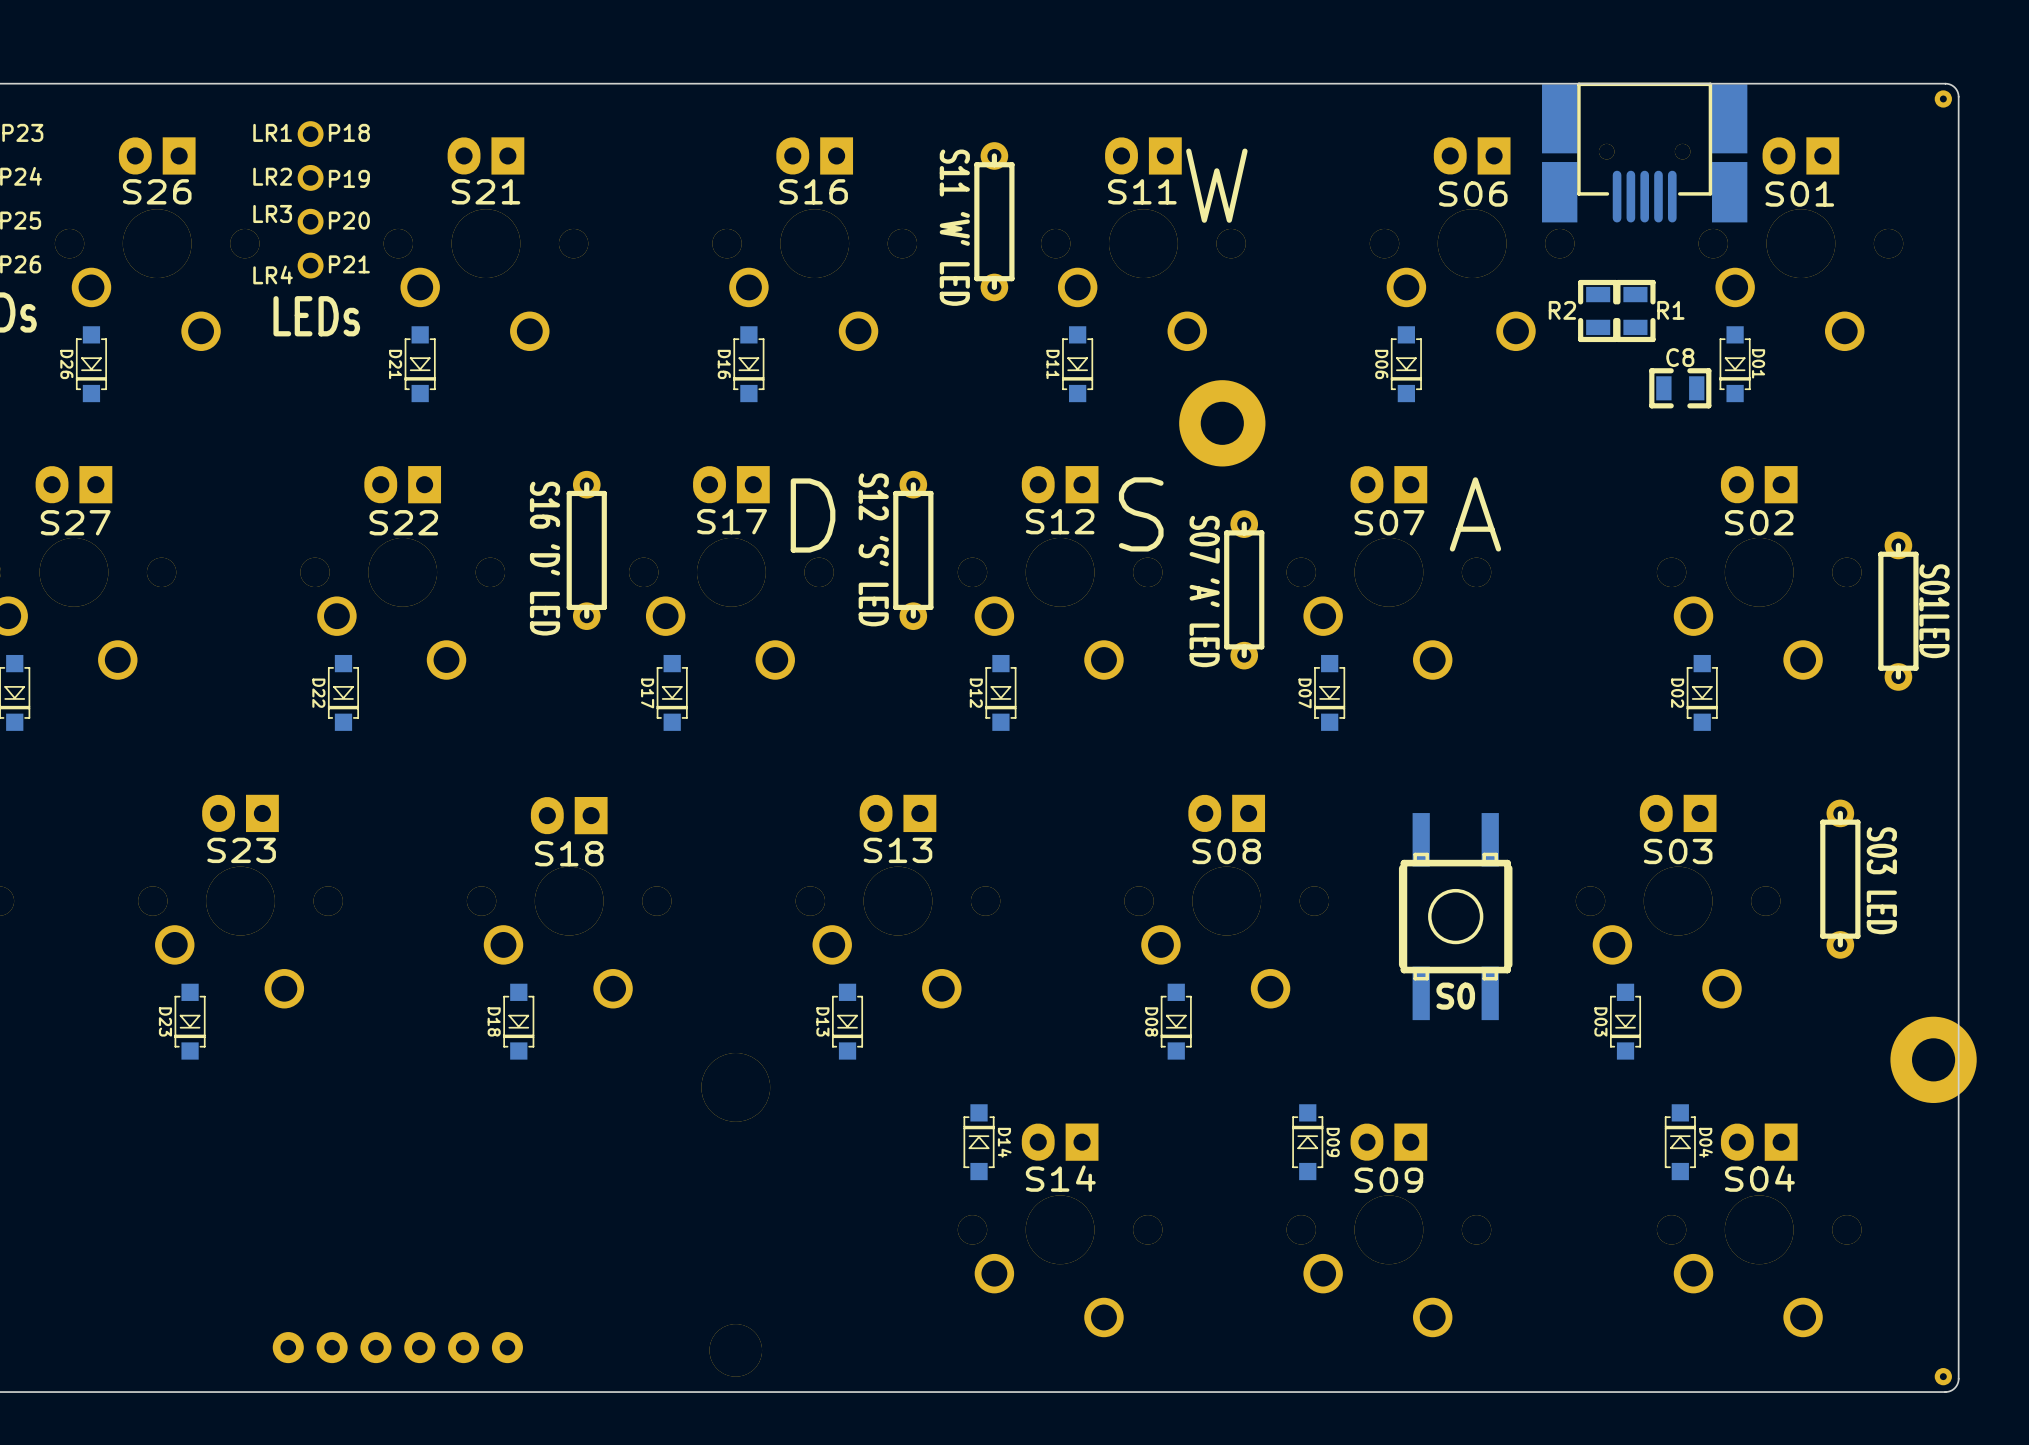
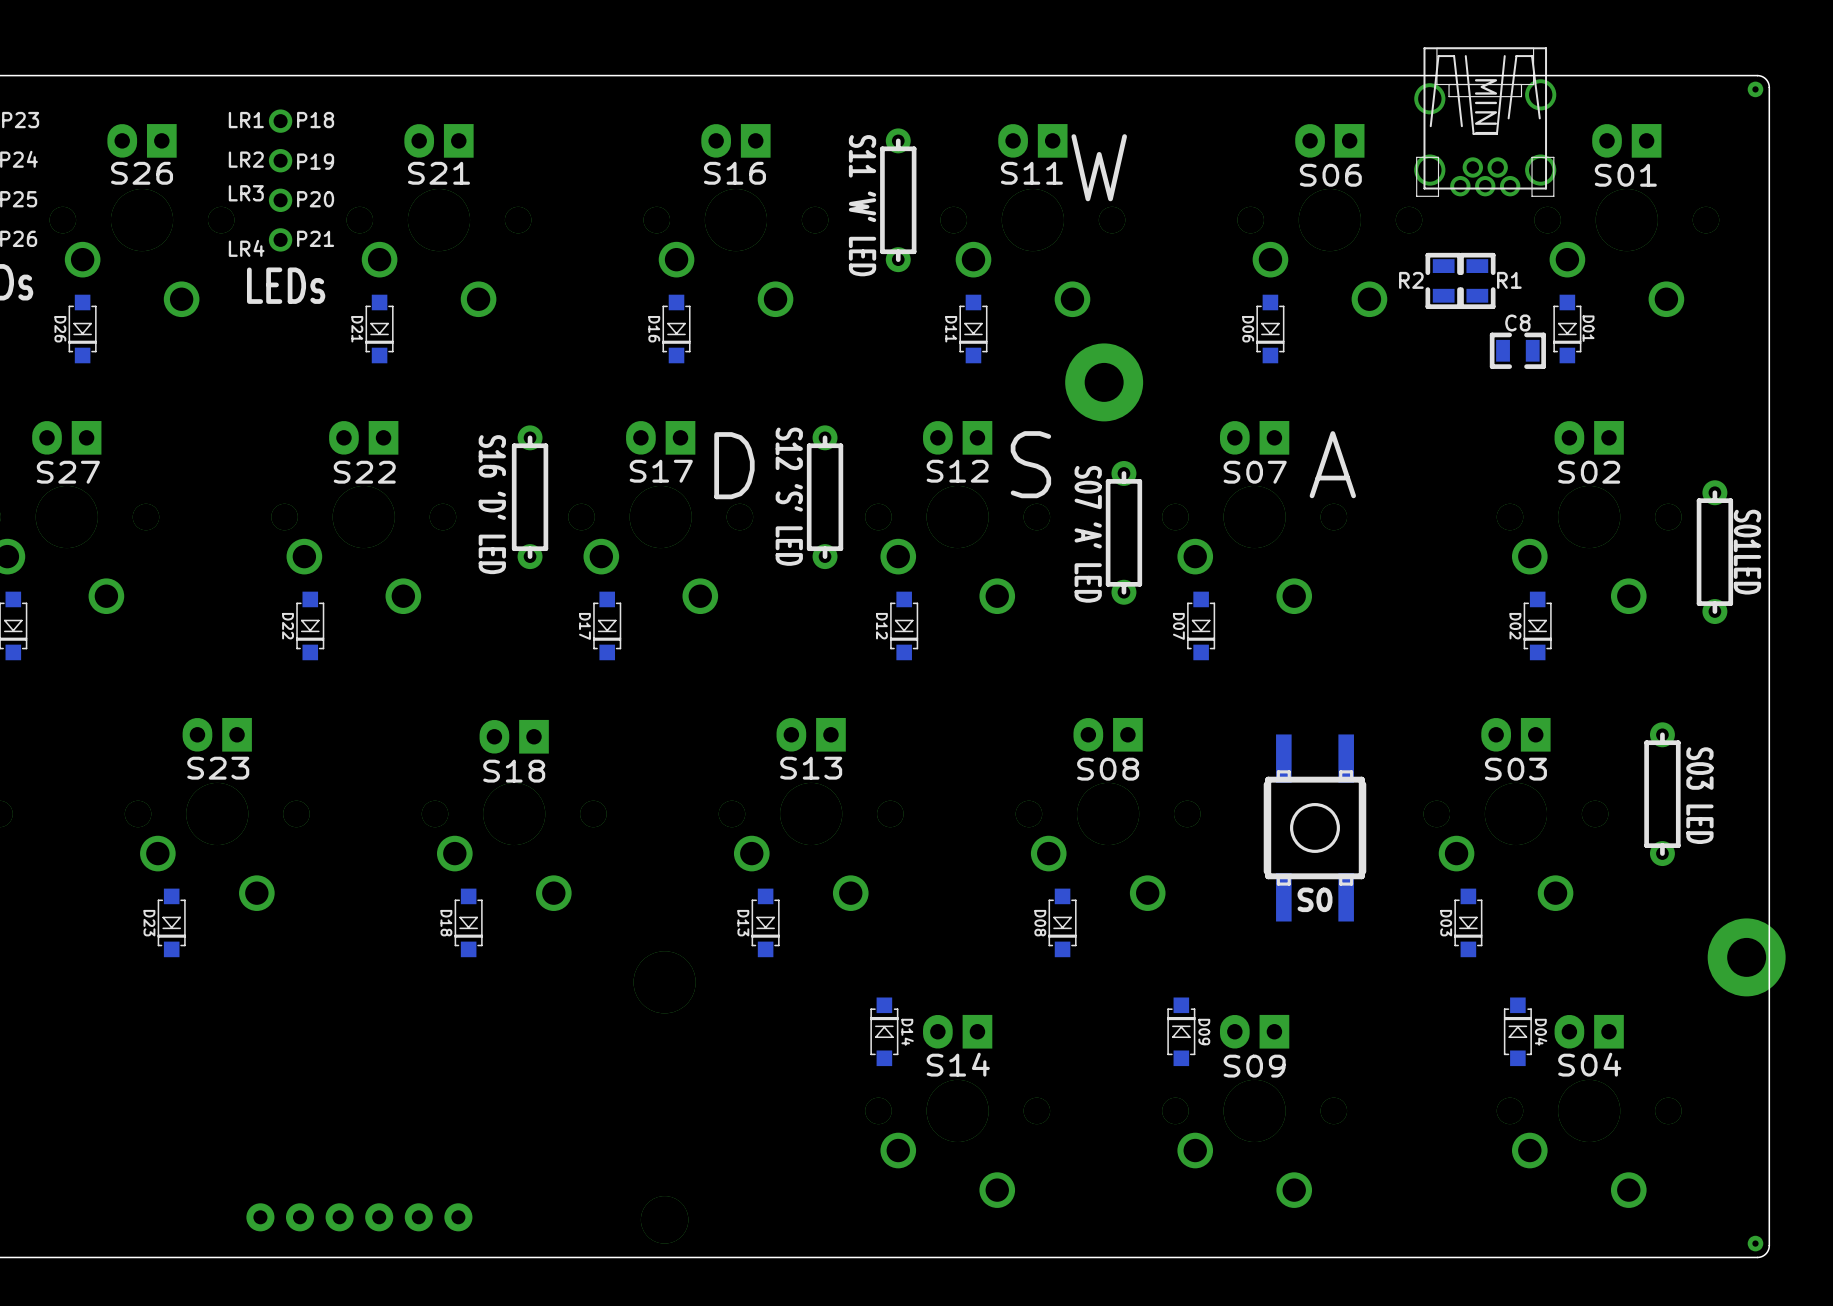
part: none -> MINI (1485, 122)
part: (1644, 152) -> none

